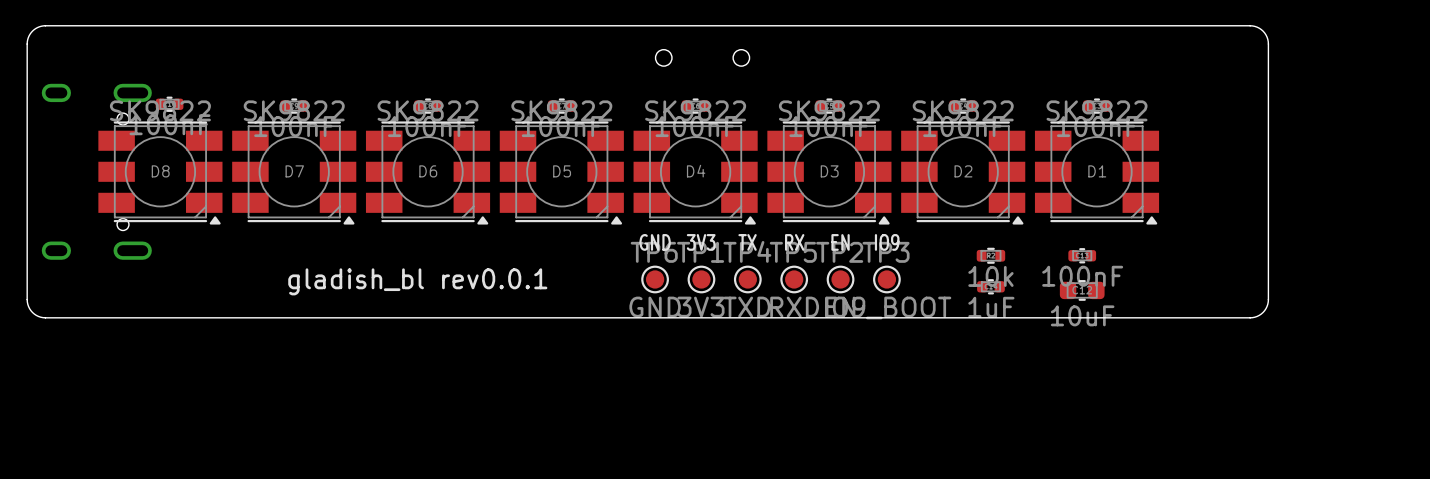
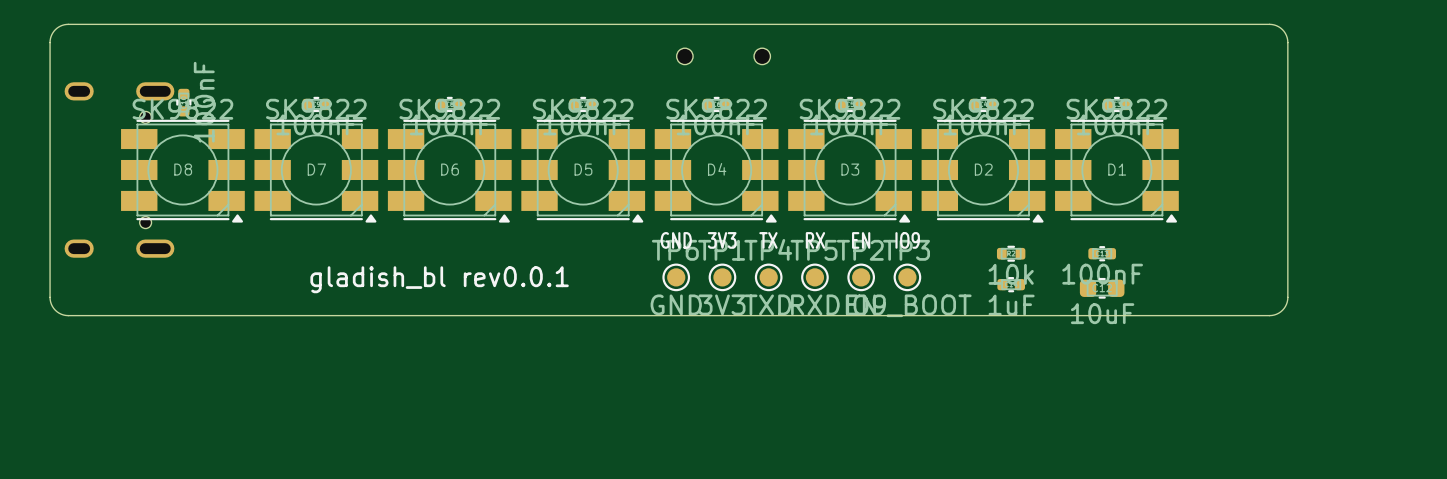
part rotation: 0° (169, 104) -> 90° clockwise (183, 102)

